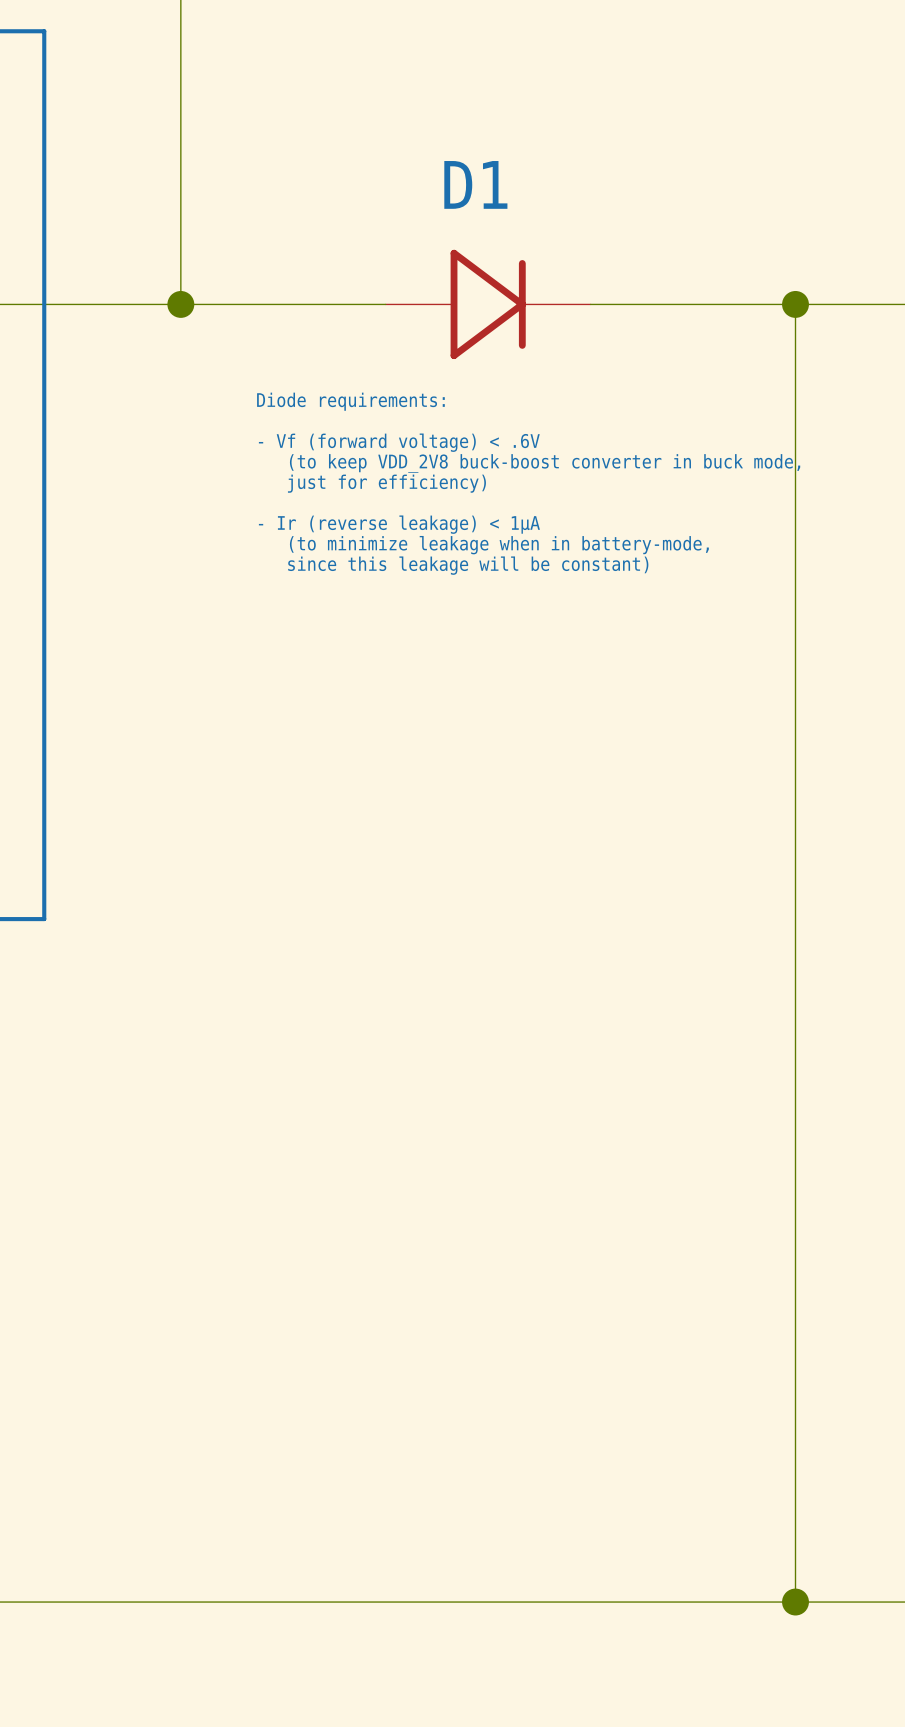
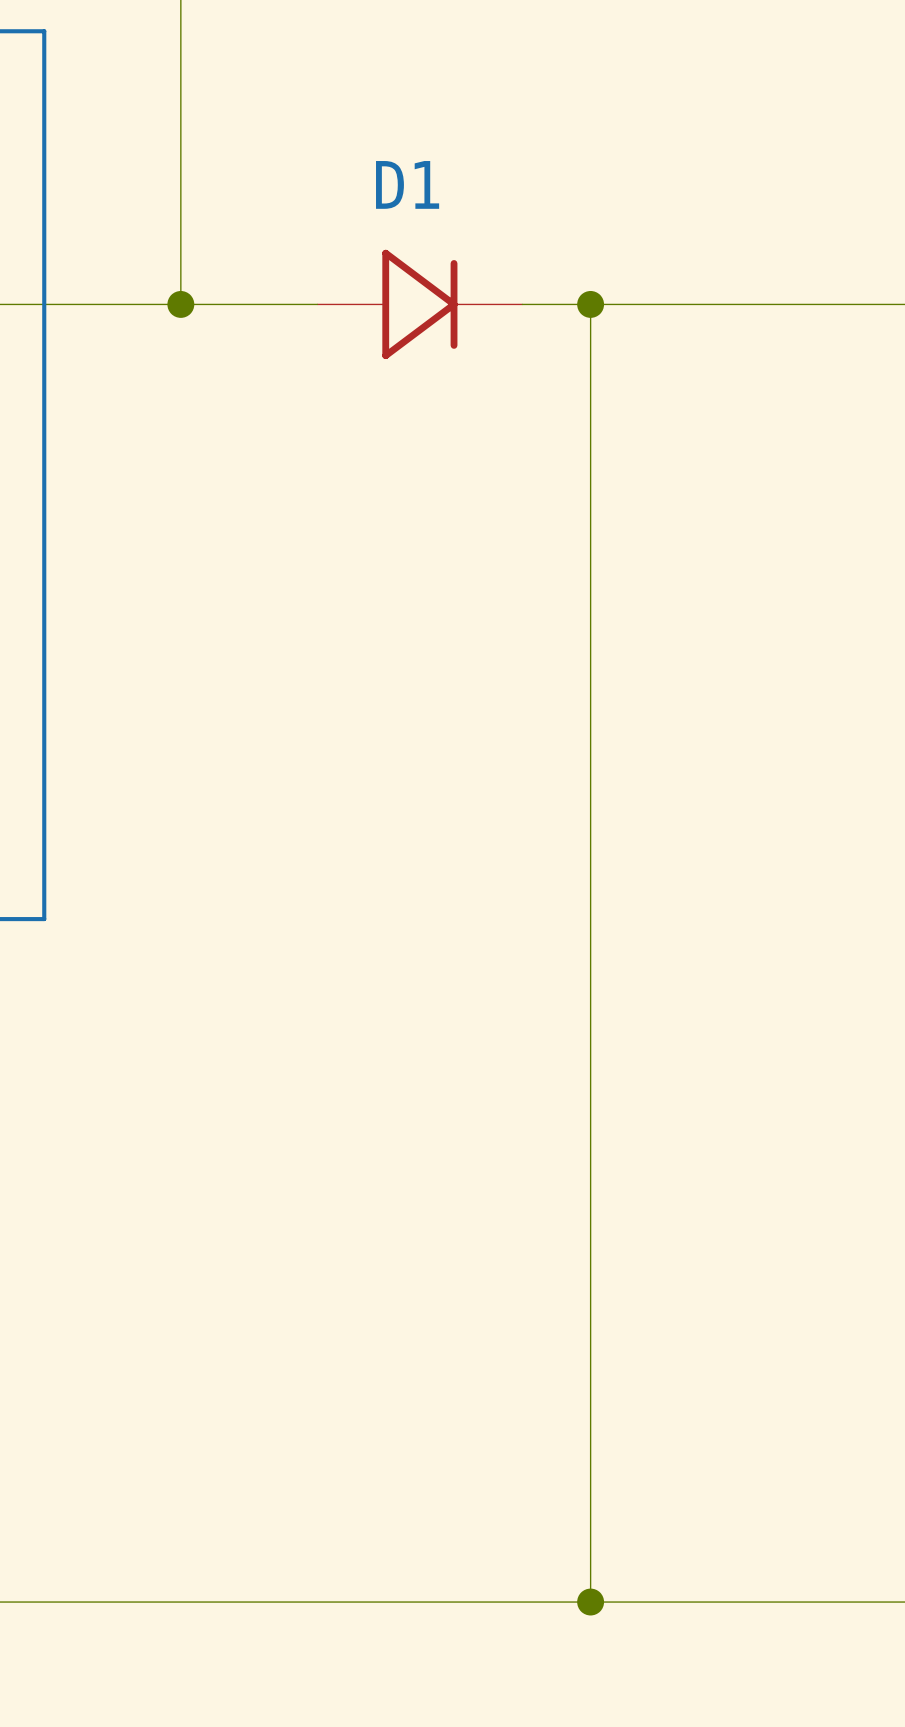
D1 position: (488, 304) -> (419, 304)
wire: none -> (522, 304) (590, 304) (590, 1602)
junction: none -> (590, 304)
wire: (795, 304) (795, 1602) -> none
junction: (795, 304) -> none
text: Diode requirements: (350, 401) -> none
text: - Vf (forward voltage) < .6V (399, 442) -> none
text: (to keep VDD_2V8 buck-boost converter in buck mode, (545, 463) -> none
text: just for efficiency) (386, 483) -> none
text: - Ir (reverse leakage) < 1µA (399, 524) -> none
text: (to minimize leakage when in battery-mode, (499, 545) -> none
text: since this leakage will be constant) (468, 565) -> none
junction: none -> (590, 1602)
junction: (795, 1602) -> none

